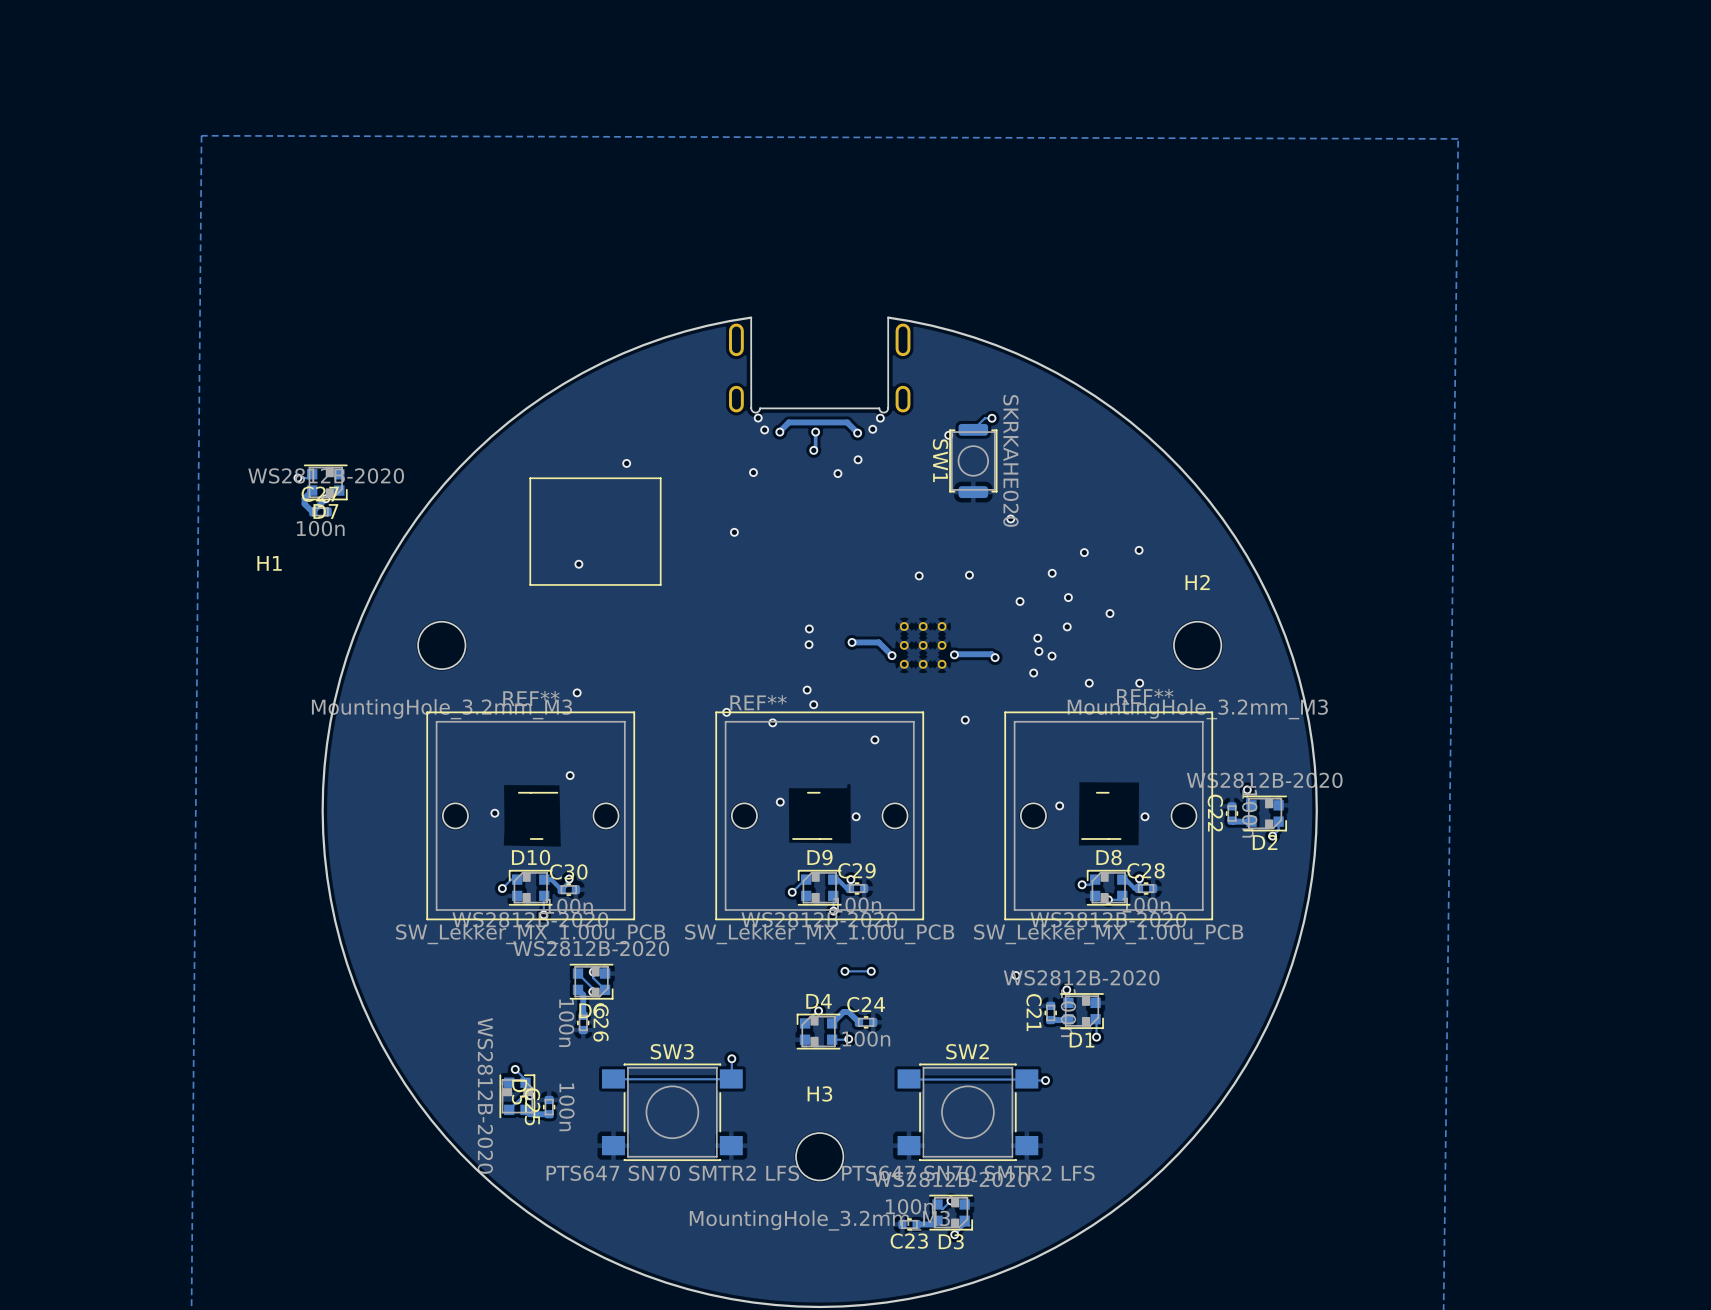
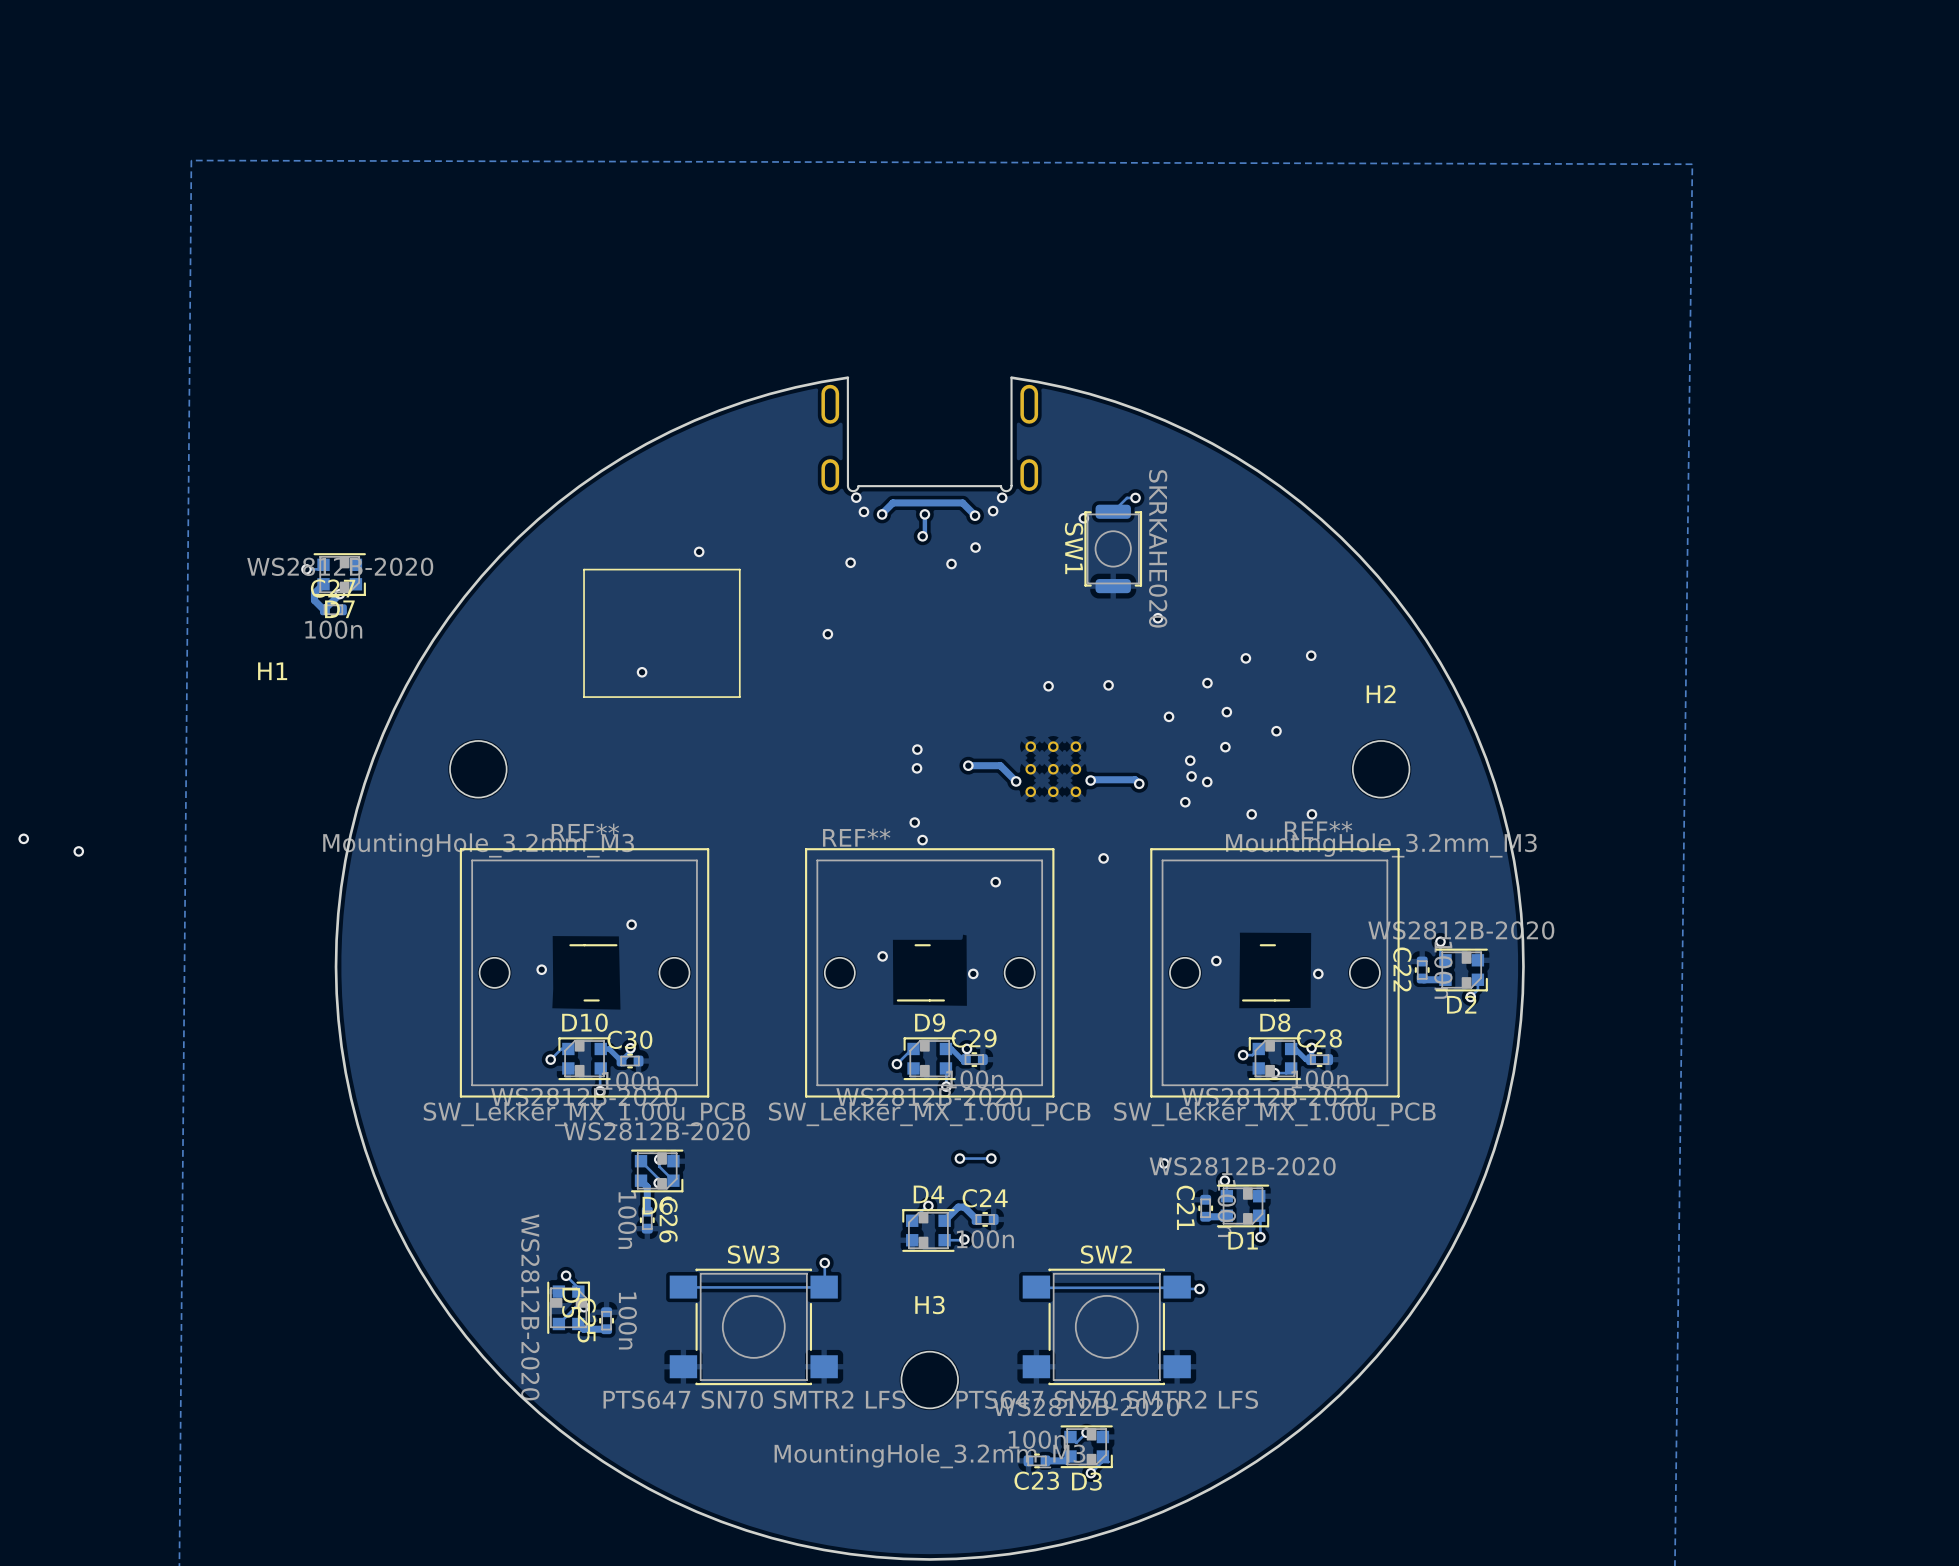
via: (577, 692) -> none
via: none -> (23, 838)
via: (726, 712) -> none
via: none -> (78, 851)
via: (772, 722) -> none

